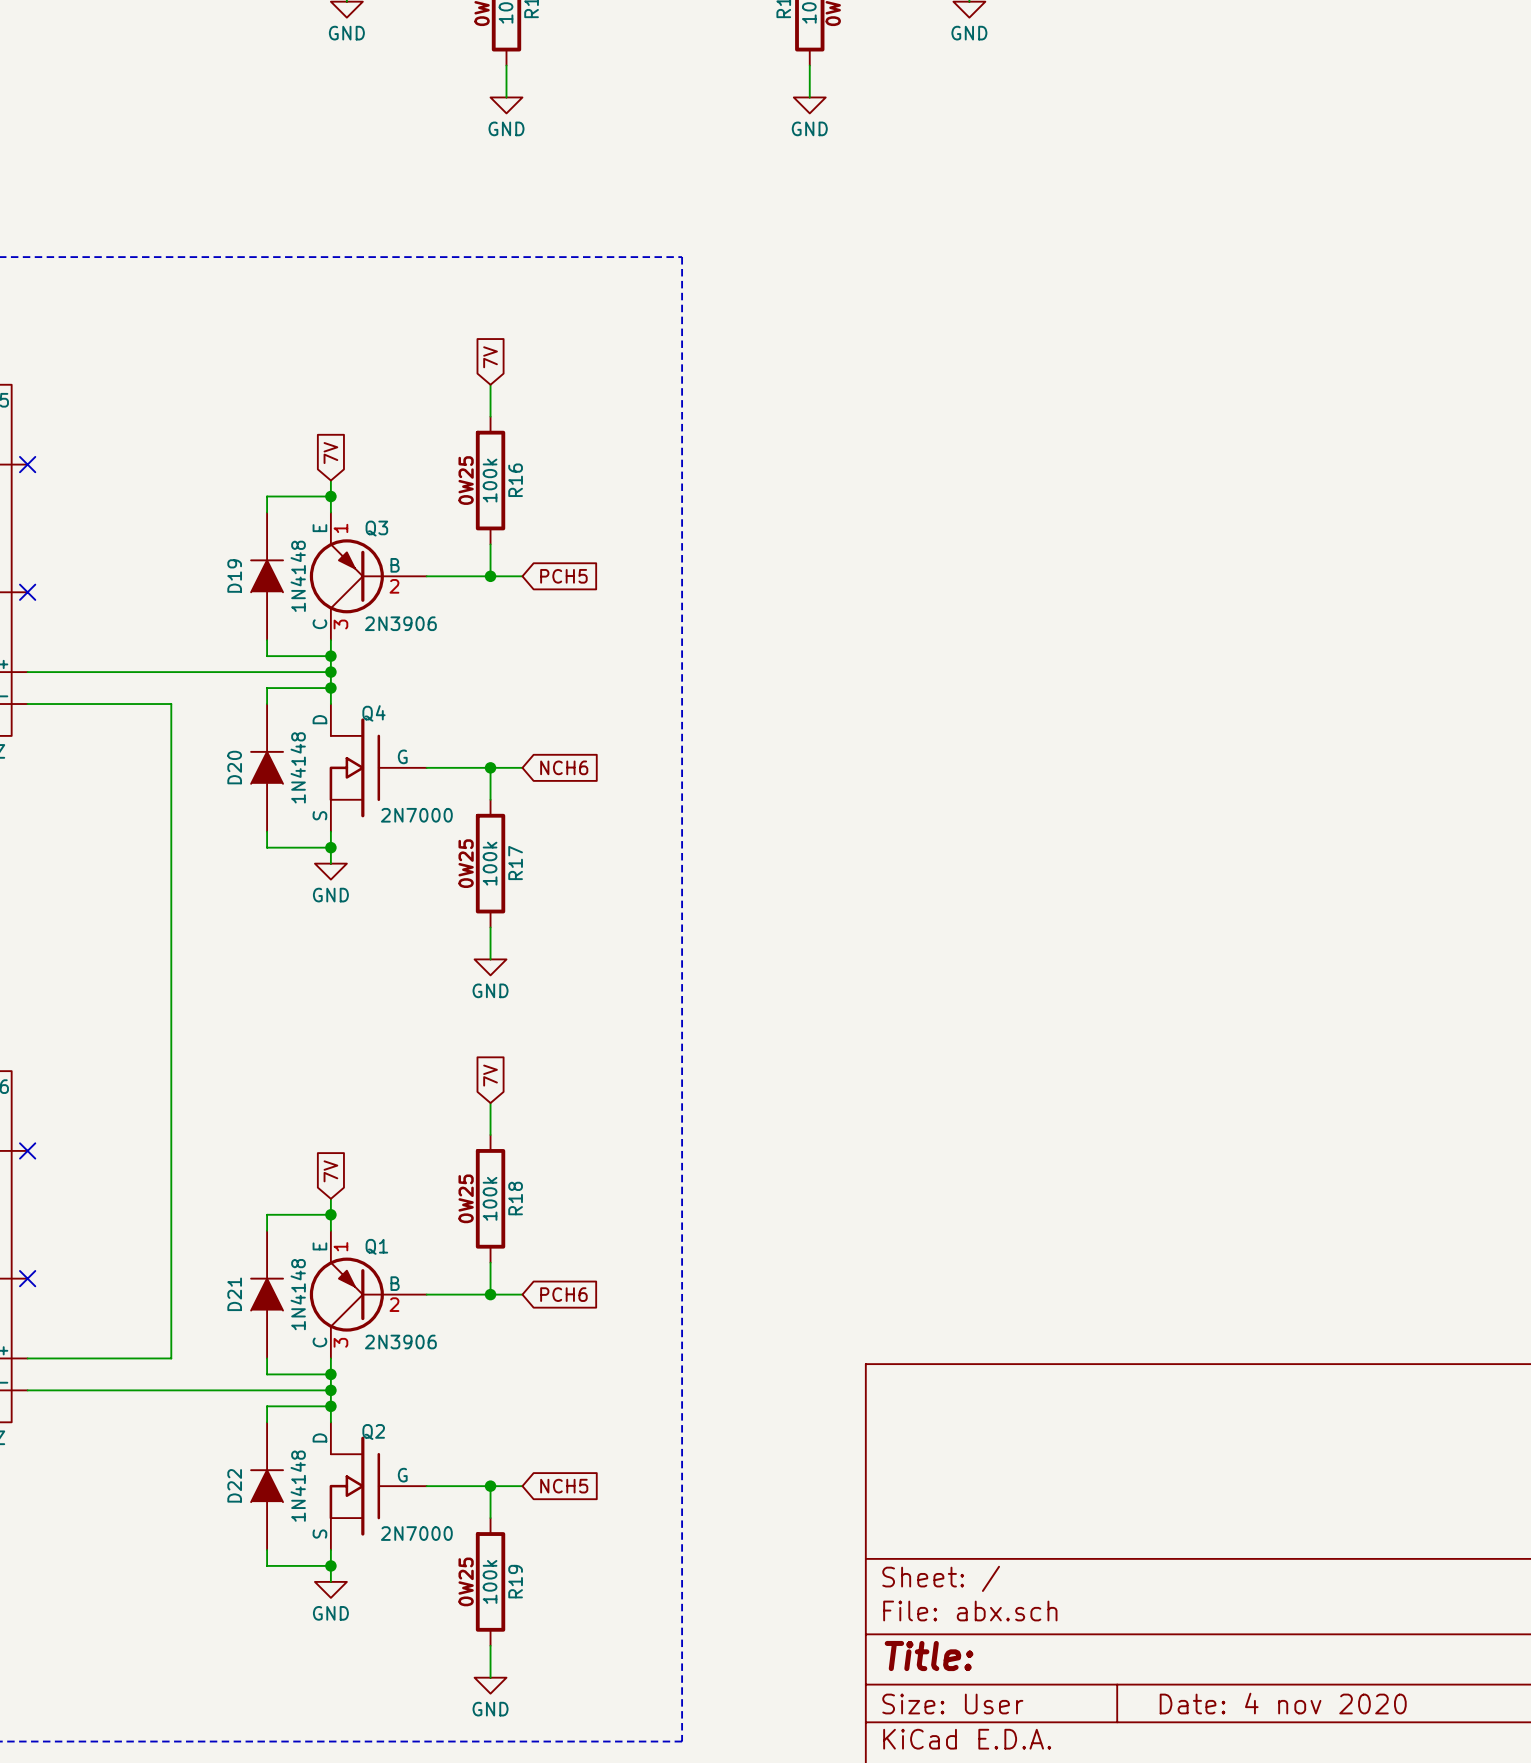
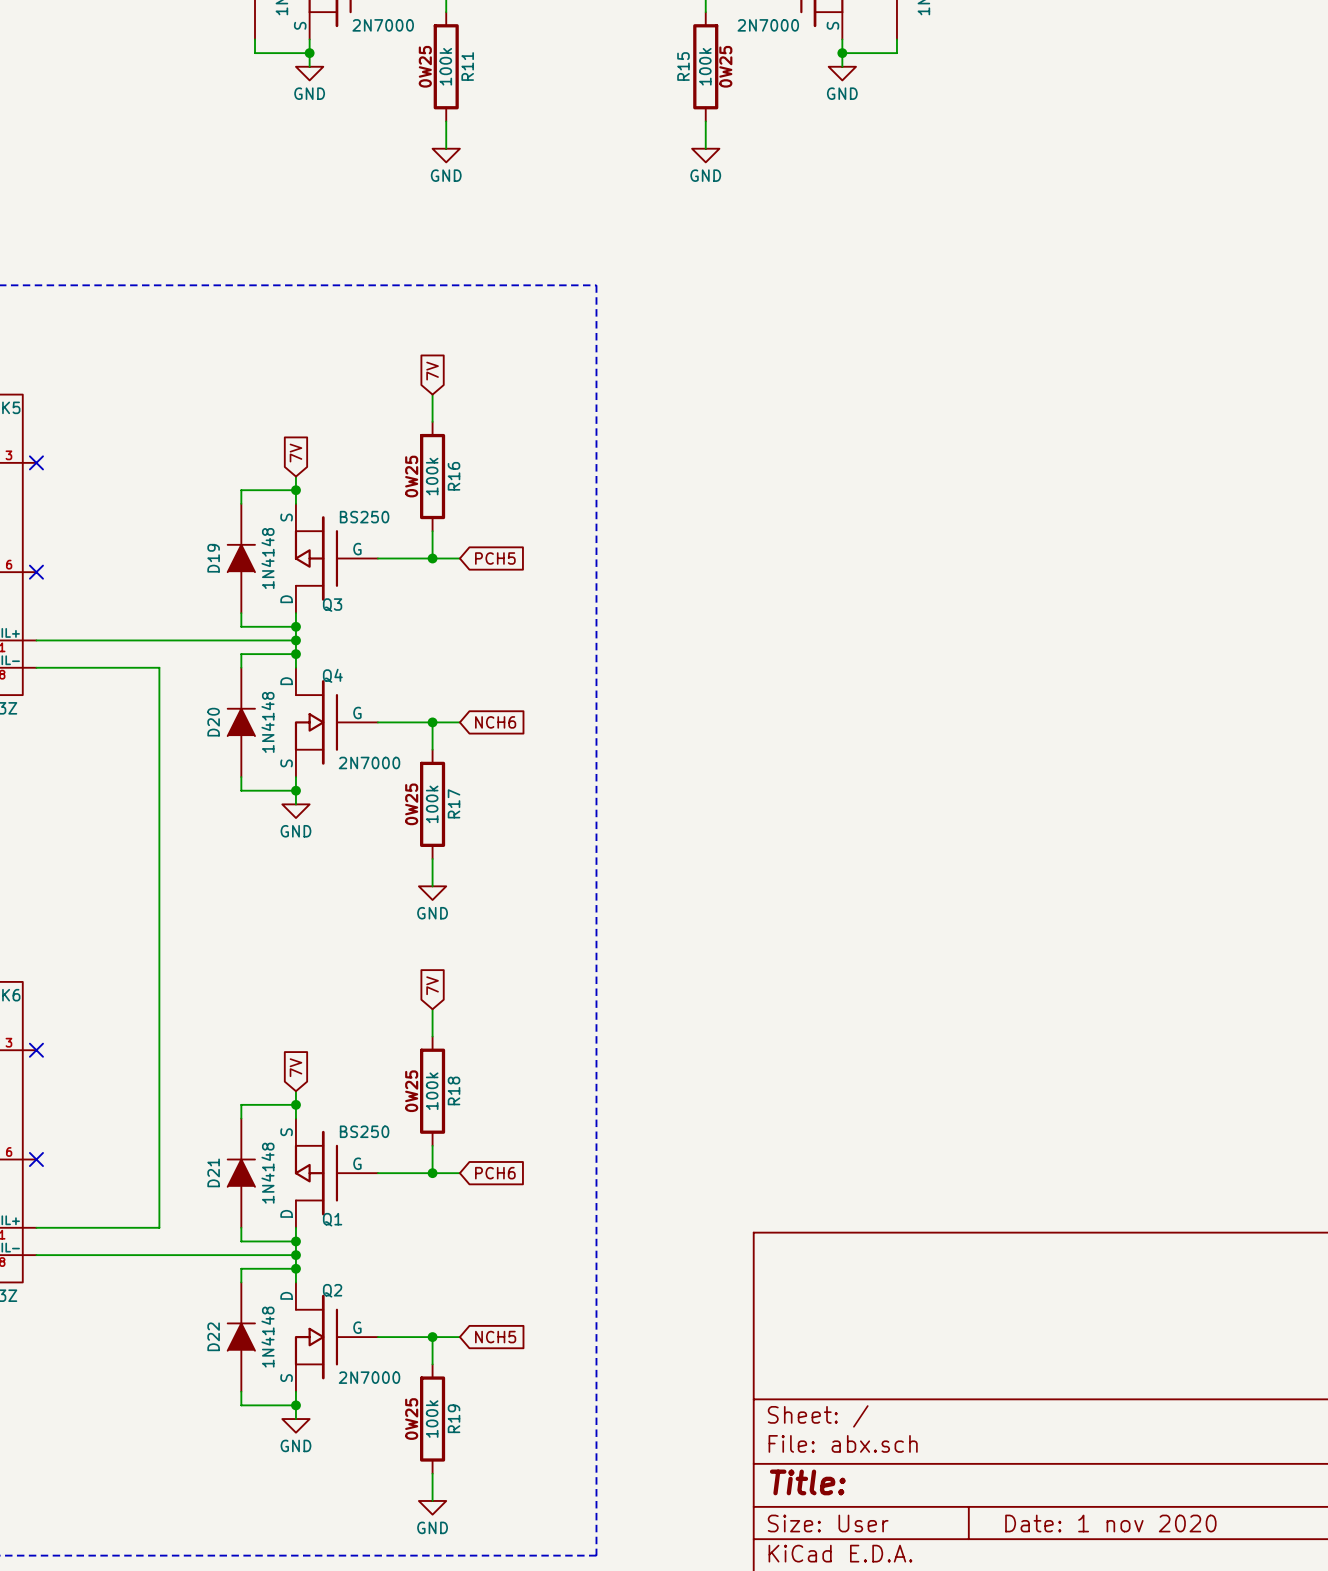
Q3 symbol: [309, 512, 427, 641] -> [294, 503, 378, 614]
Q3 name position: Q3 (376, 528) -> Q3 (332, 605)
Q3 value: 2N3906 (400, 623) -> BS250 (364, 517)
Q1 symbol: [309, 1230, 427, 1359] -> [294, 1118, 378, 1228]
Q1 name position: Q1 (376, 1246) -> Q1 (332, 1219)
Q1 value: 2N3906 (400, 1342) -> BS250 (364, 1131)
title block: Date: 4 nov 2020 (1283, 1703) -> Date: 1 nov 2020 (1110, 1523)

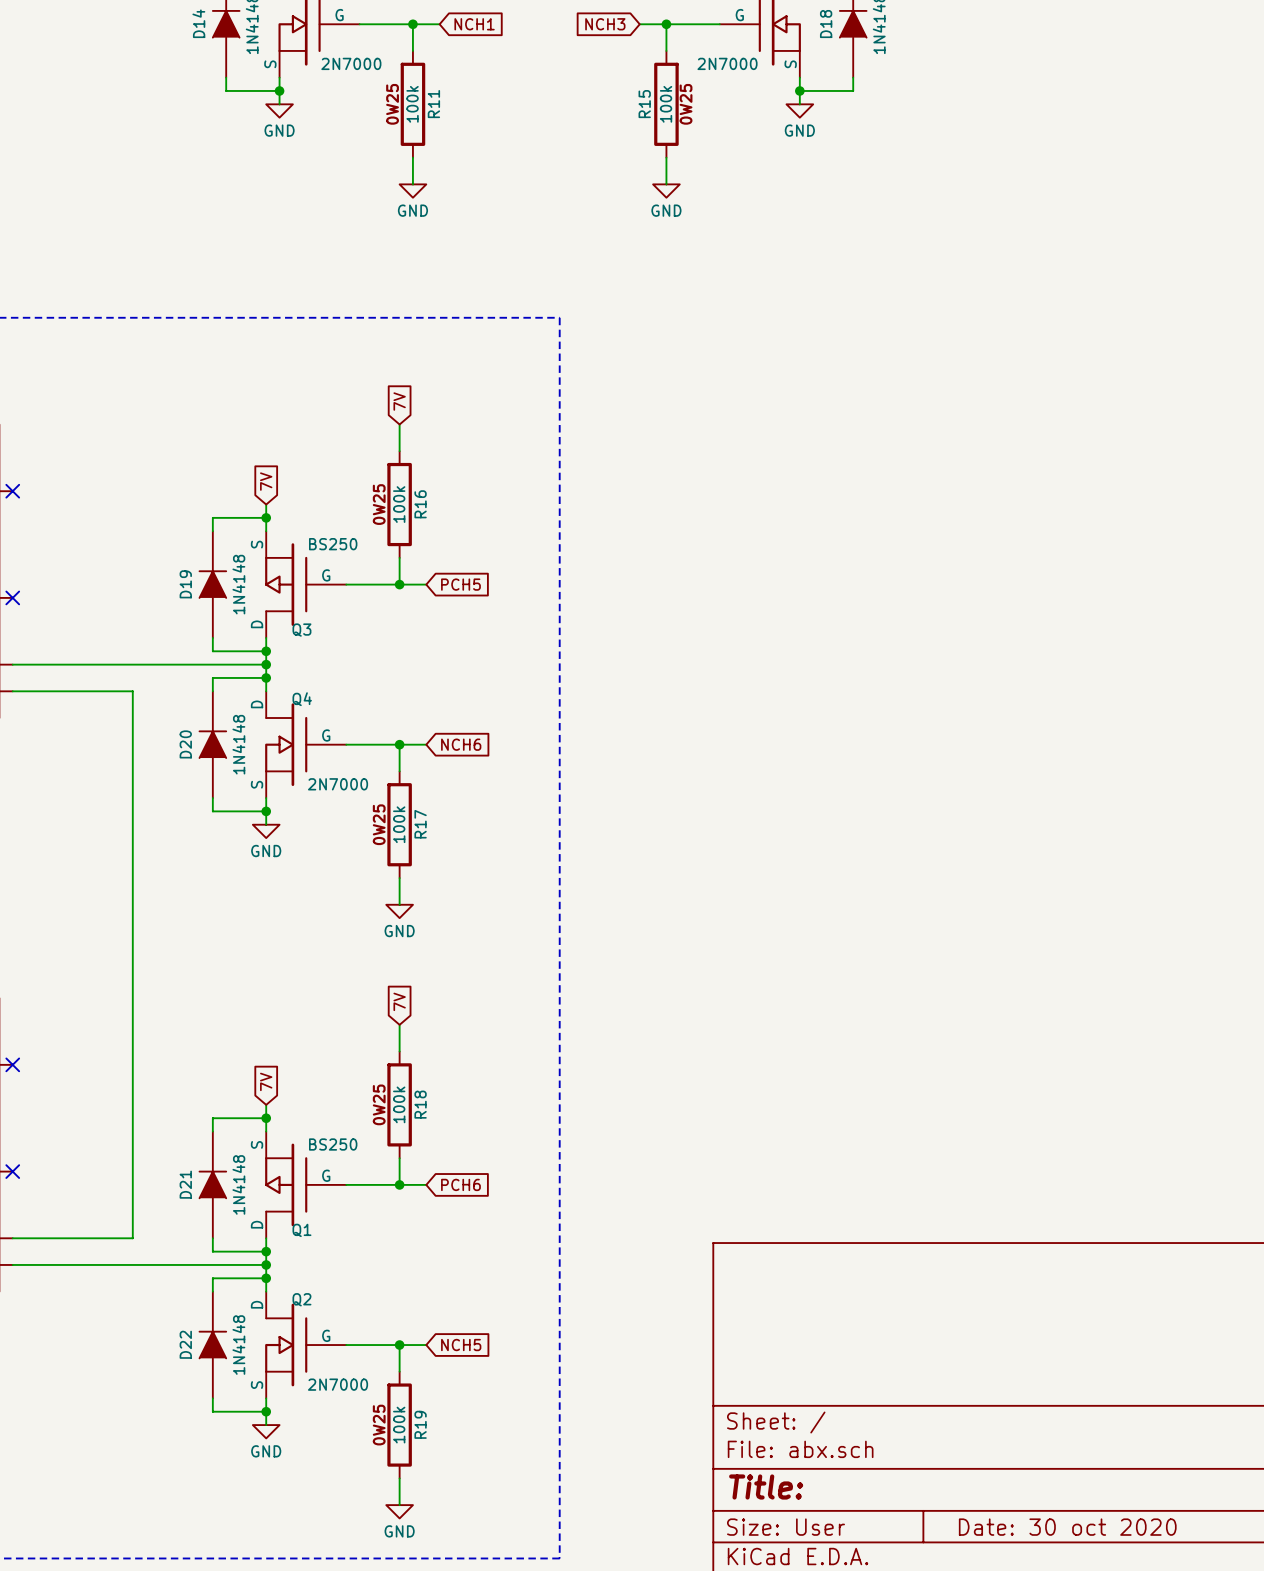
title block: Date: 1 nov 2020 (1110, 1523) -> Date: 30 oct 2020 (1067, 1527)

